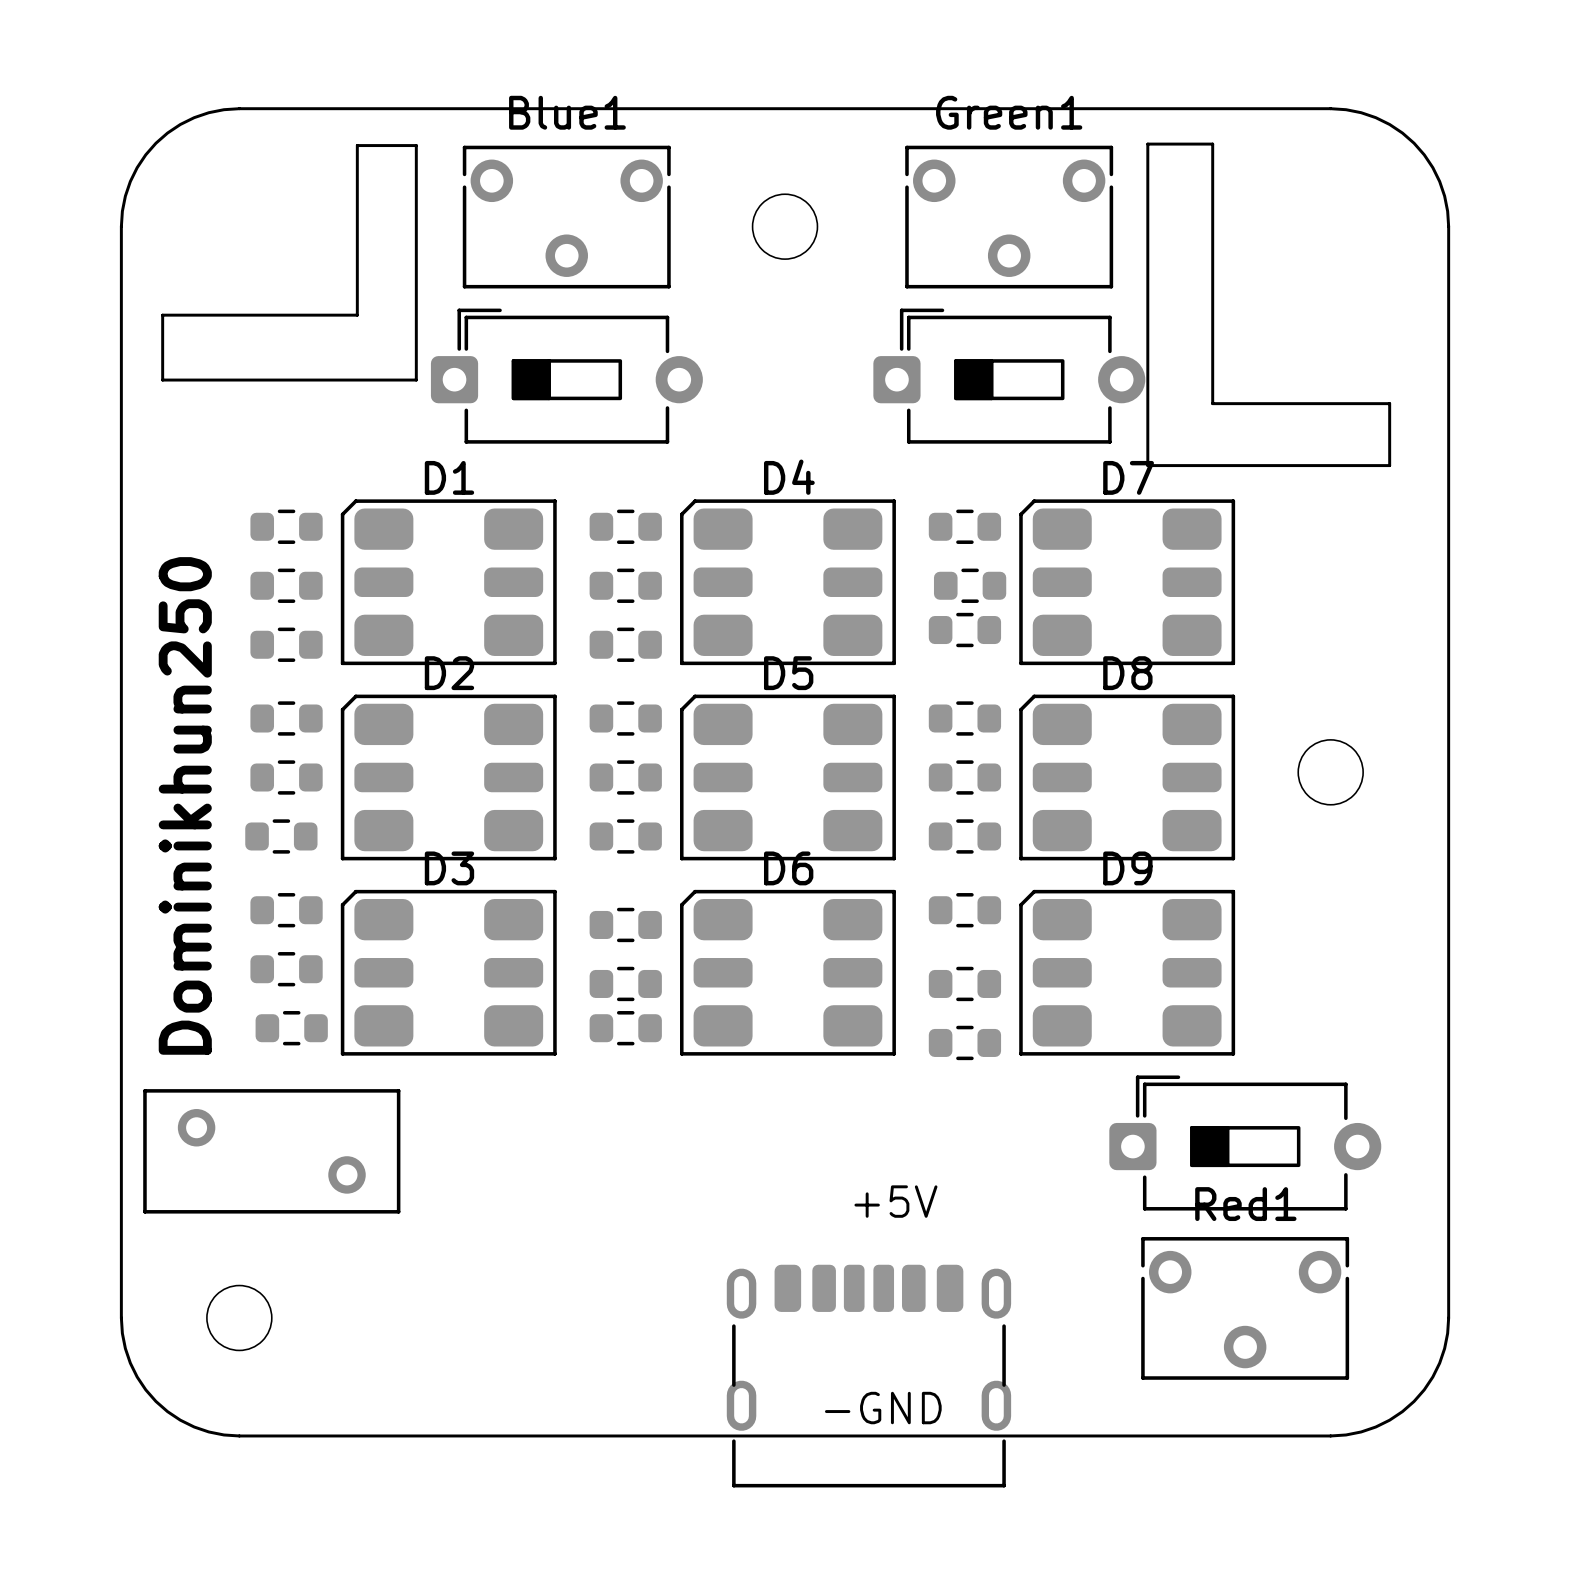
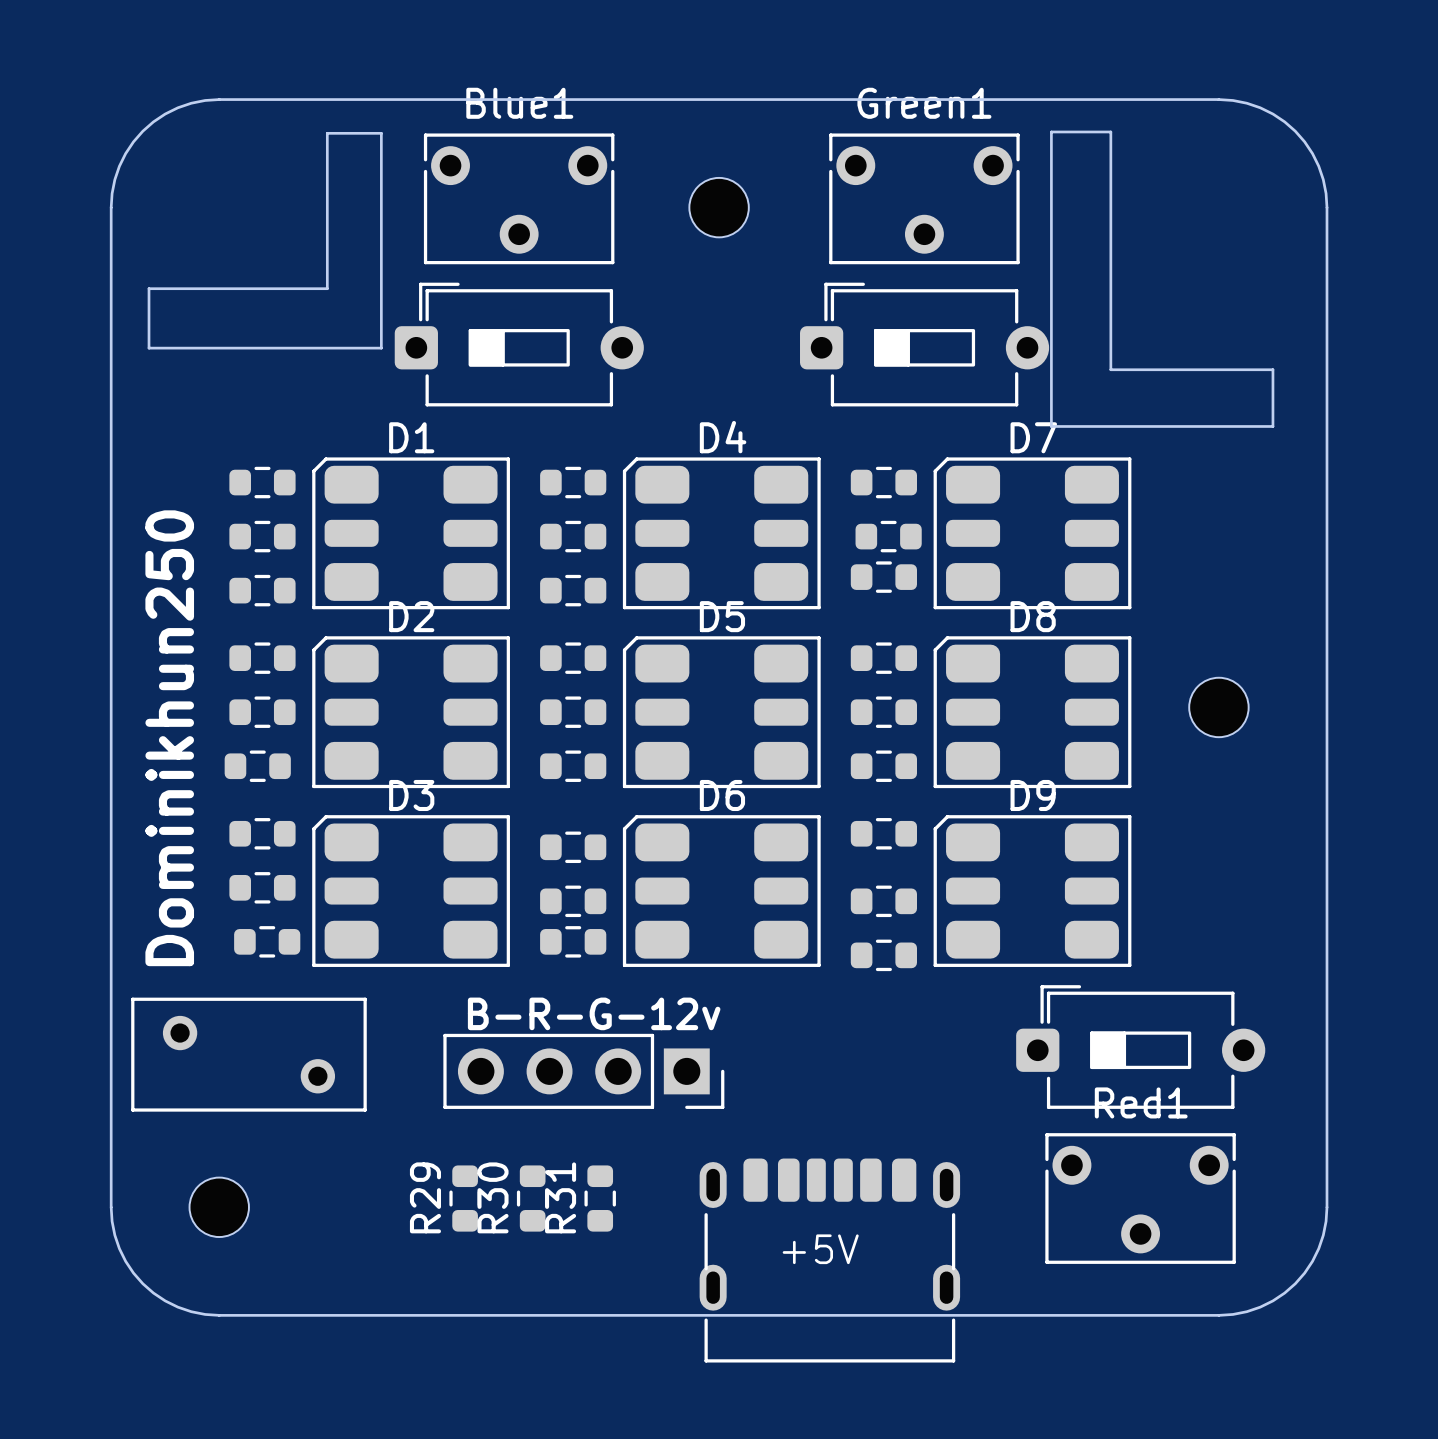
text: none -> B-R-G-12v (594, 1013)
part: none -> (583, 1071)
text position: +5V (895, 1201) -> +5V (820, 1249)
R29: none -> (465, 1198)
R30: none -> (532, 1198)
R31: none -> (600, 1198)
part position: (868, 1376) -> (829, 1260)
text: -GND (883, 1408) -> none

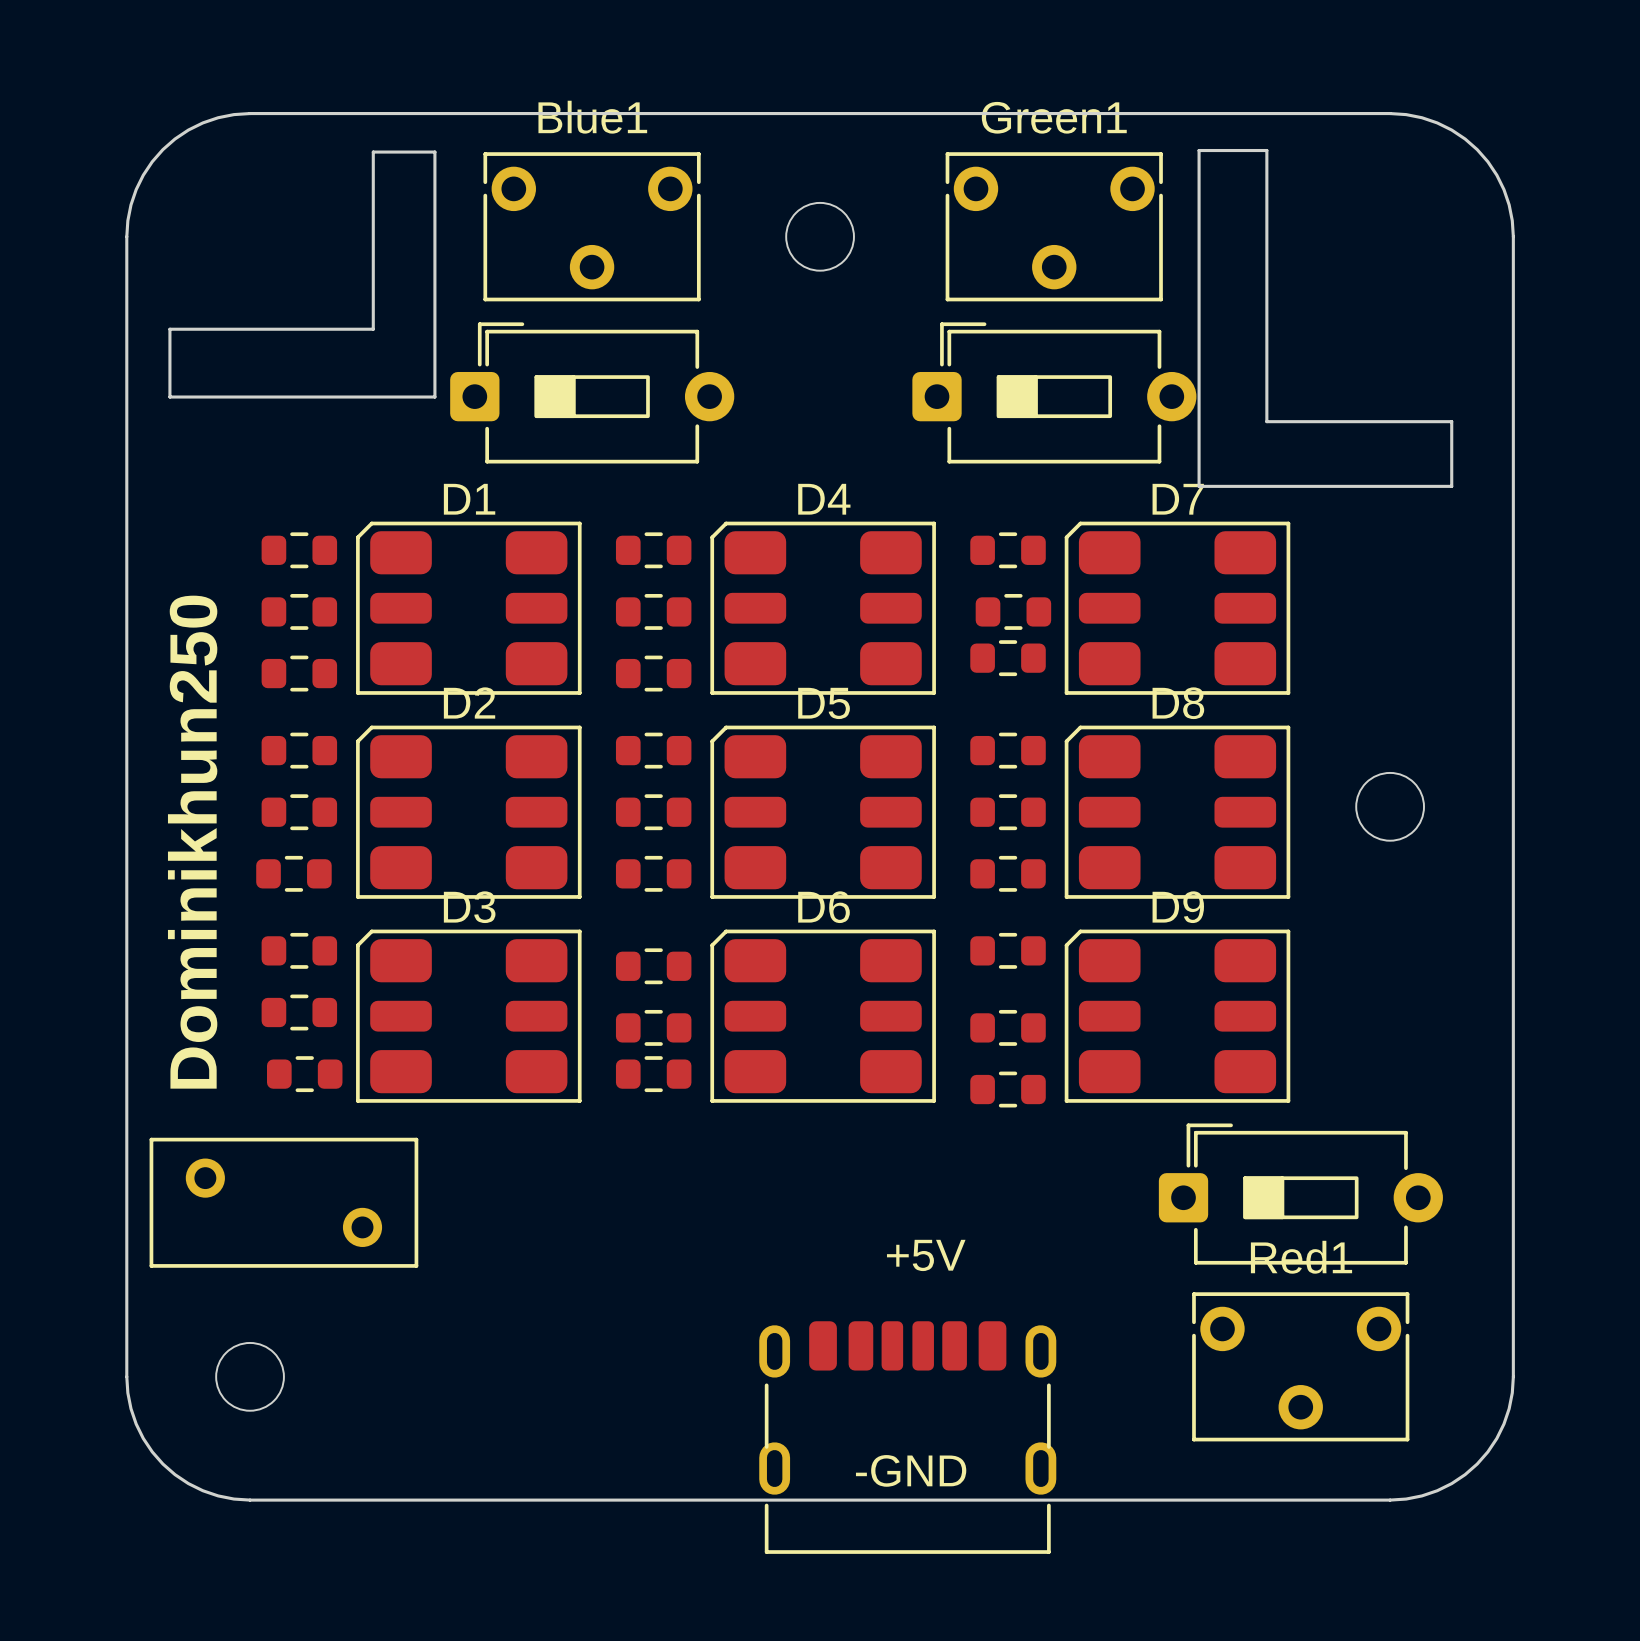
text: B-R-G-12v (594, 1013) -> none
part: (583, 1071) -> none
R29: (465, 1198) -> none
R30: (532, 1198) -> none
R31: (600, 1198) -> none
text position: +5V (820, 1249) -> +5V (926, 1255)
part position: (829, 1260) -> (907, 1437)
text: none -> -GND (911, 1470)

